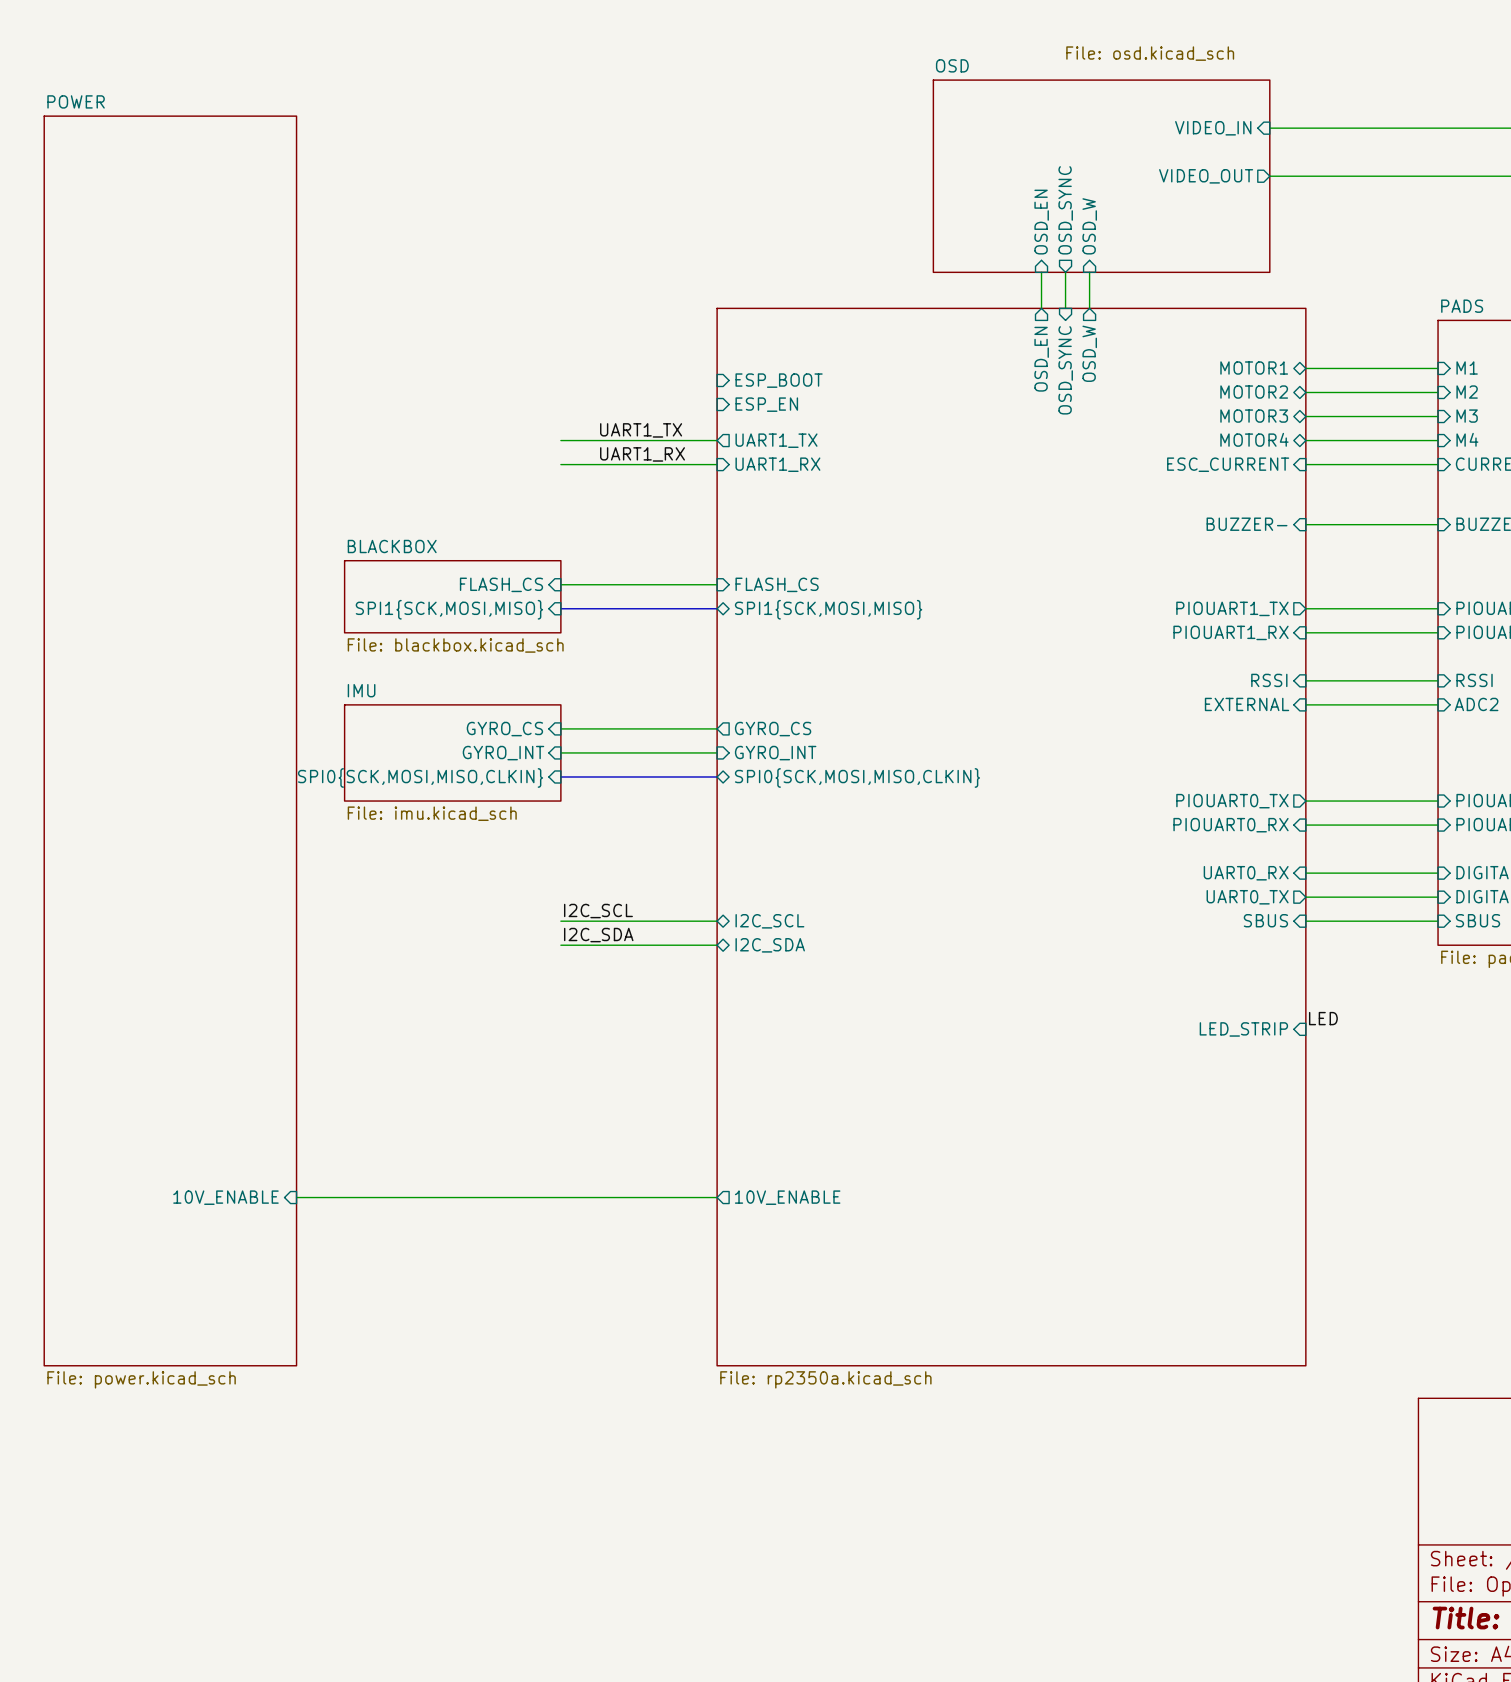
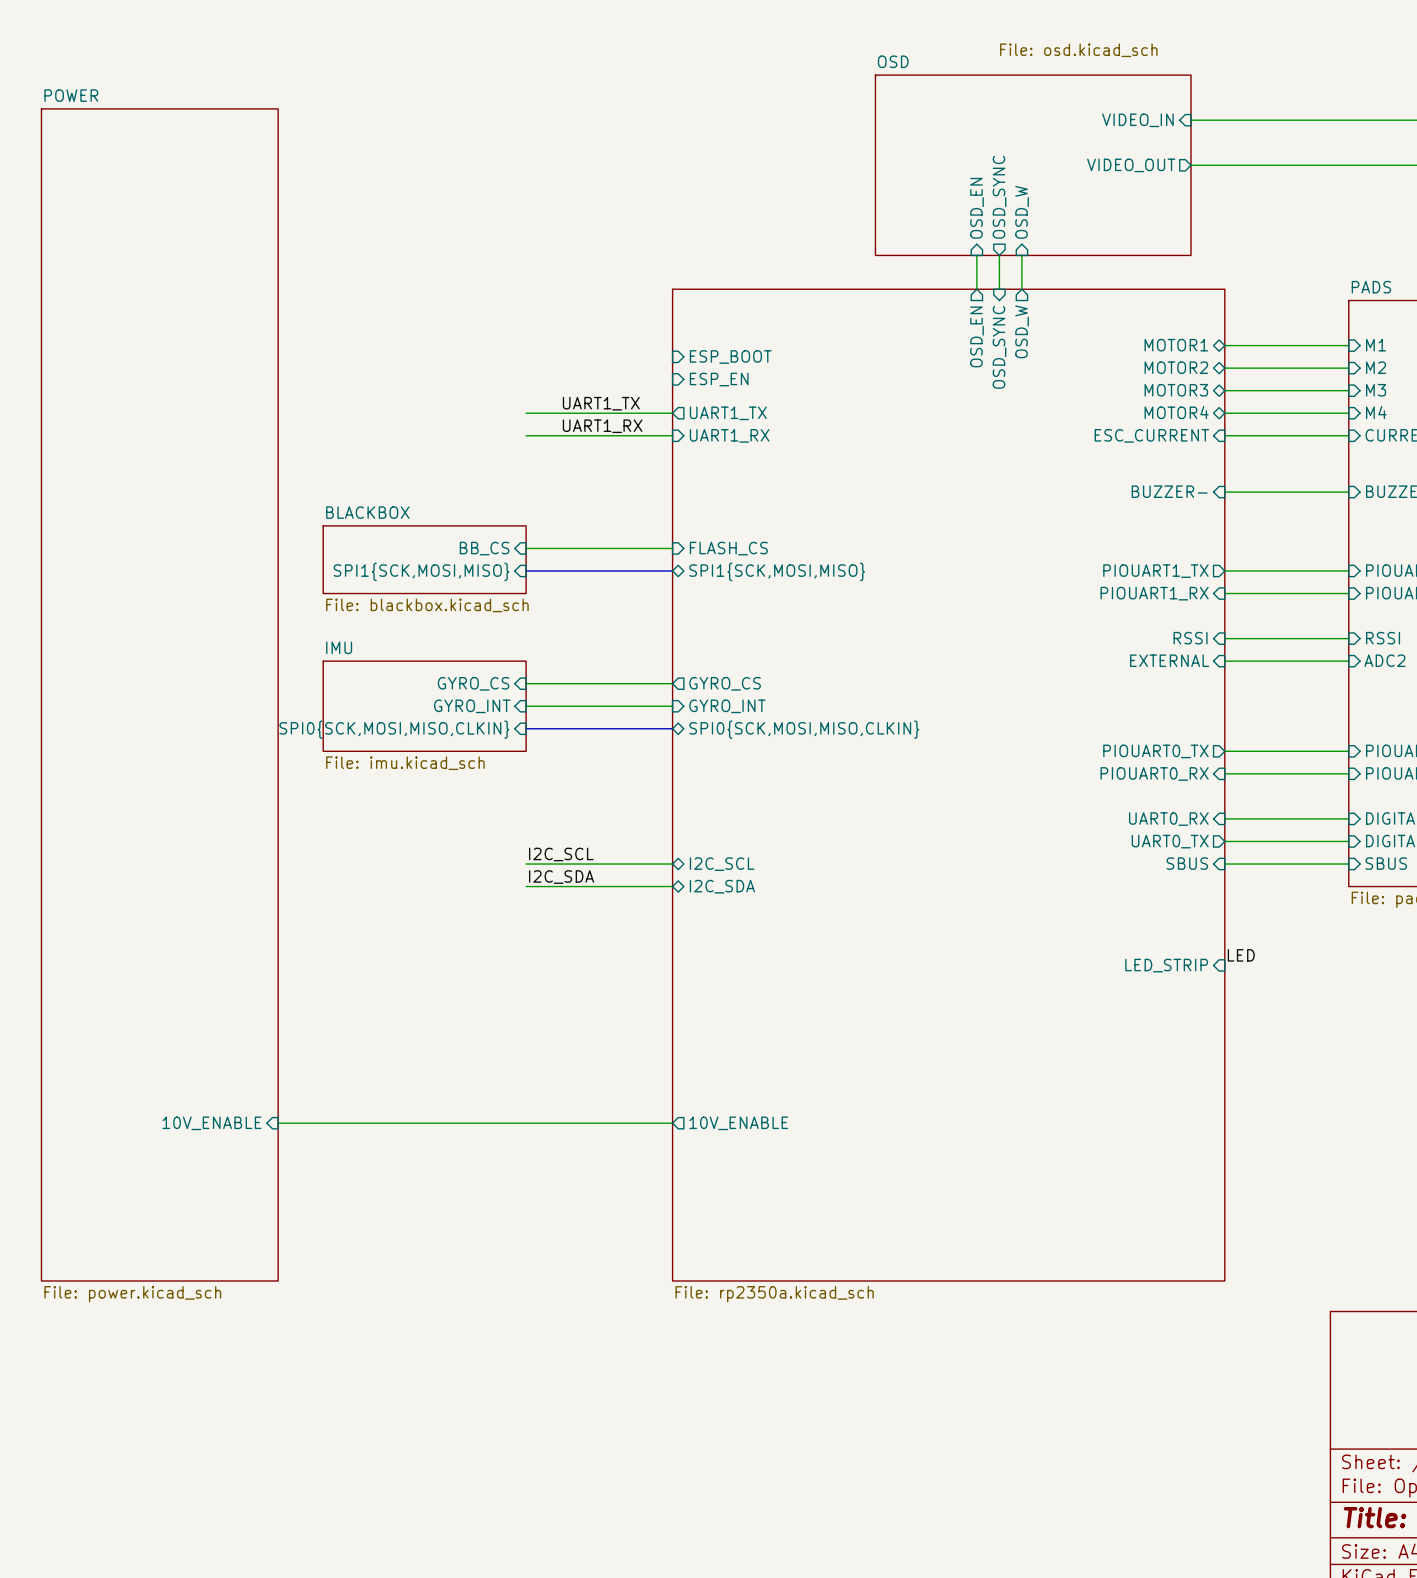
sheet pin: FLASH_CS (501, 584) -> BB_CS (484, 548)

